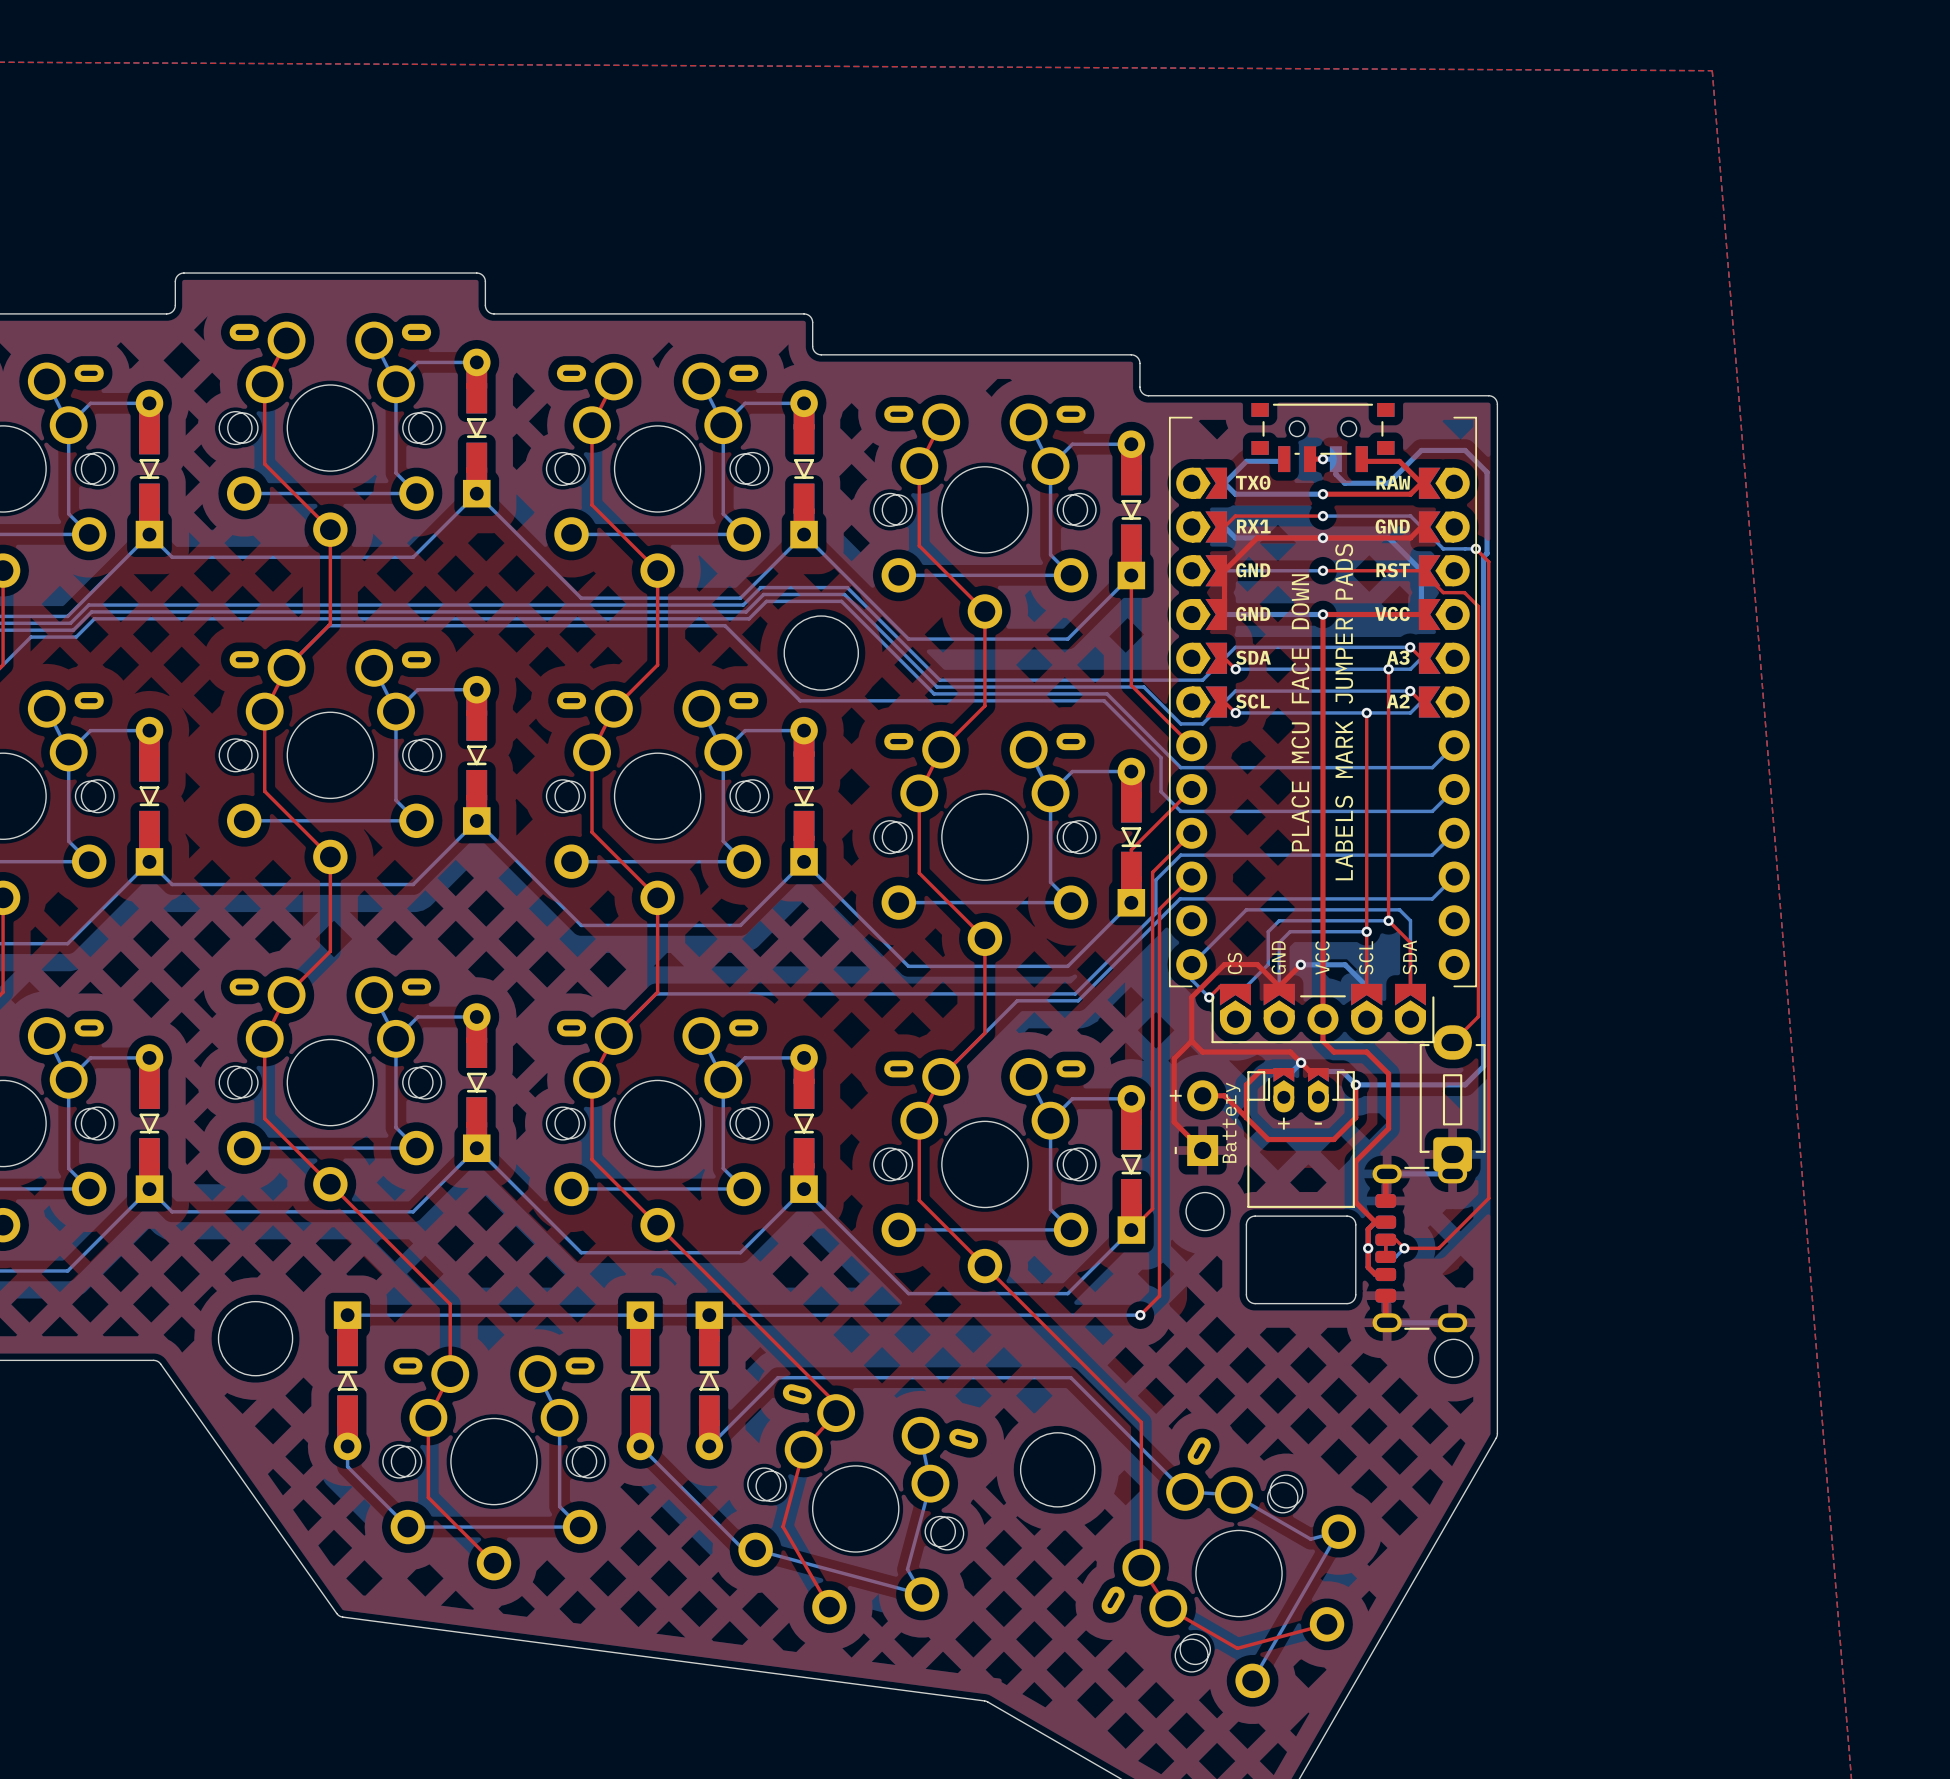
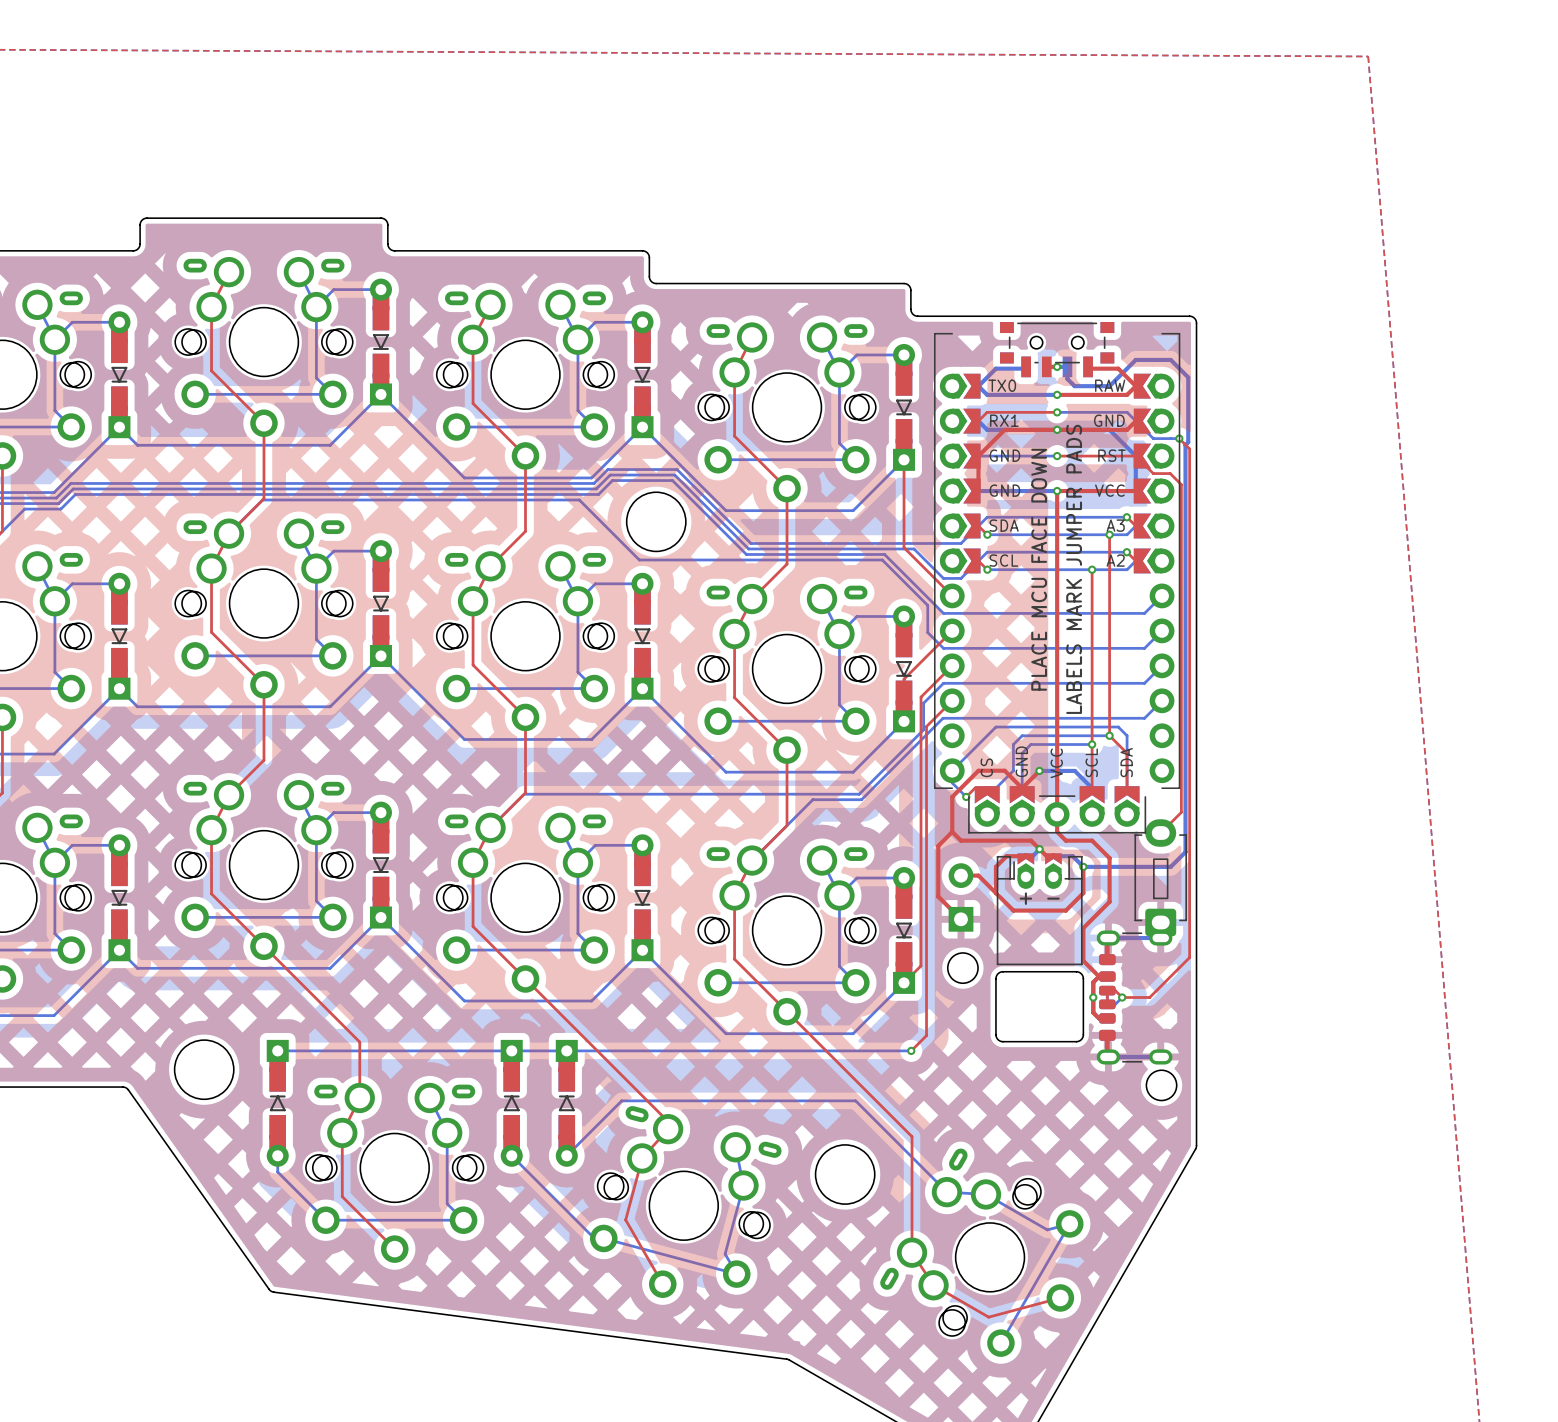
part text: + (1175, 1095) -> none
part text: Battery (1231, 1122) -> none
part text: - (1175, 1150) -> none

